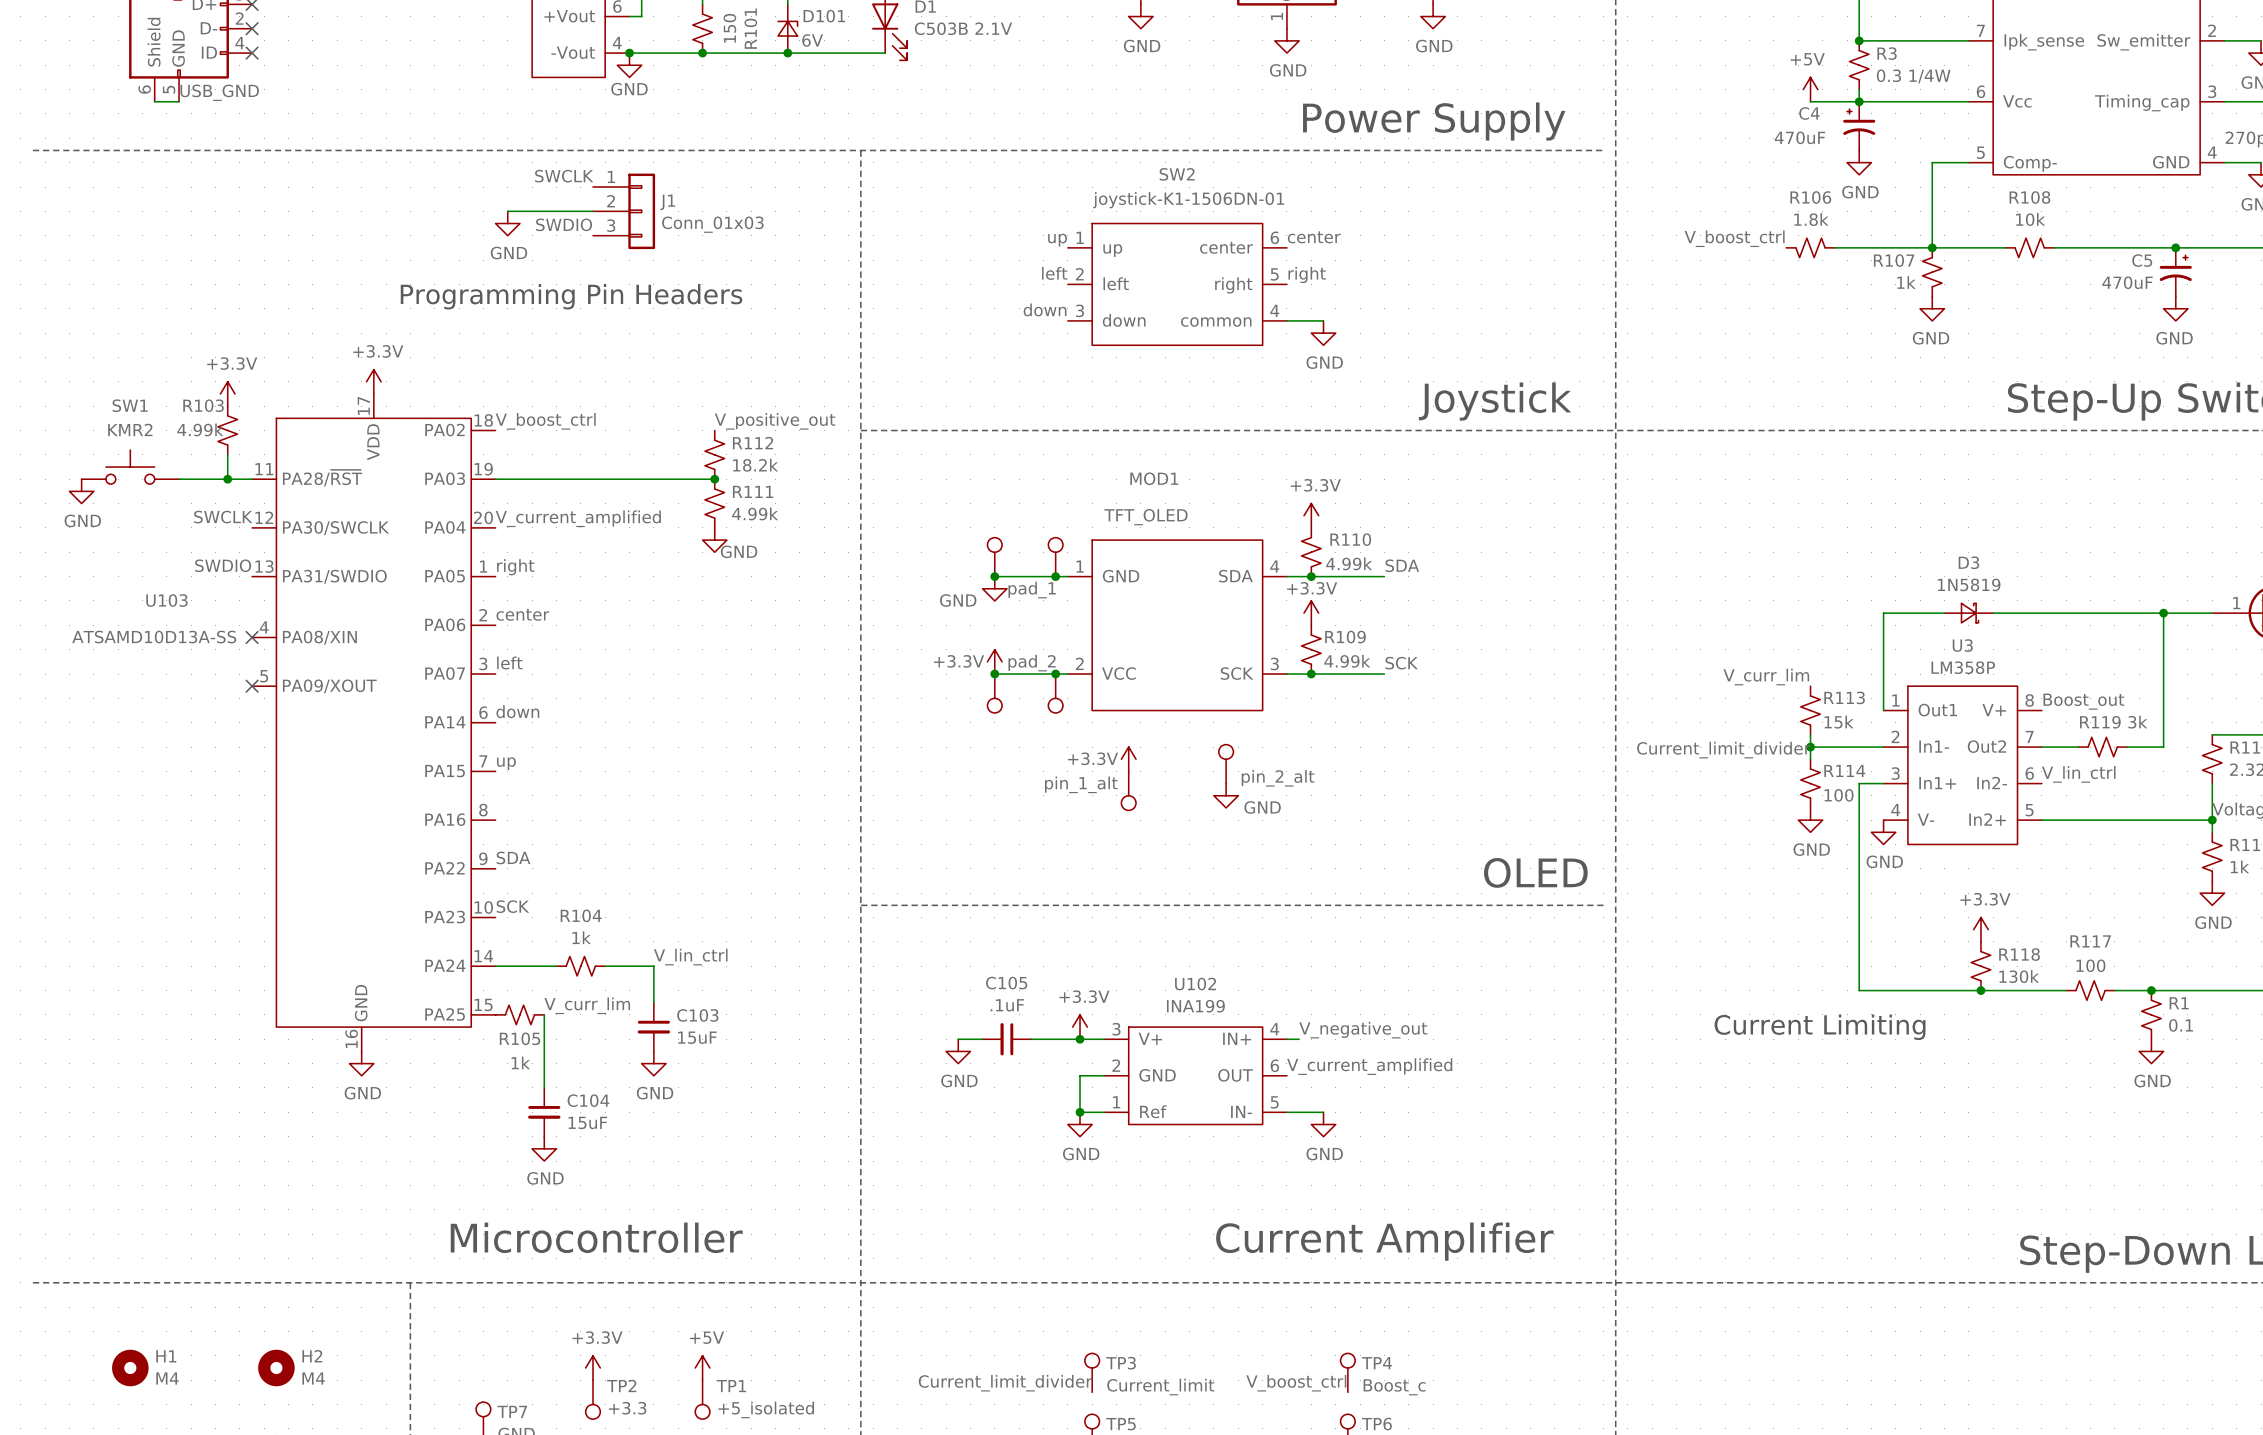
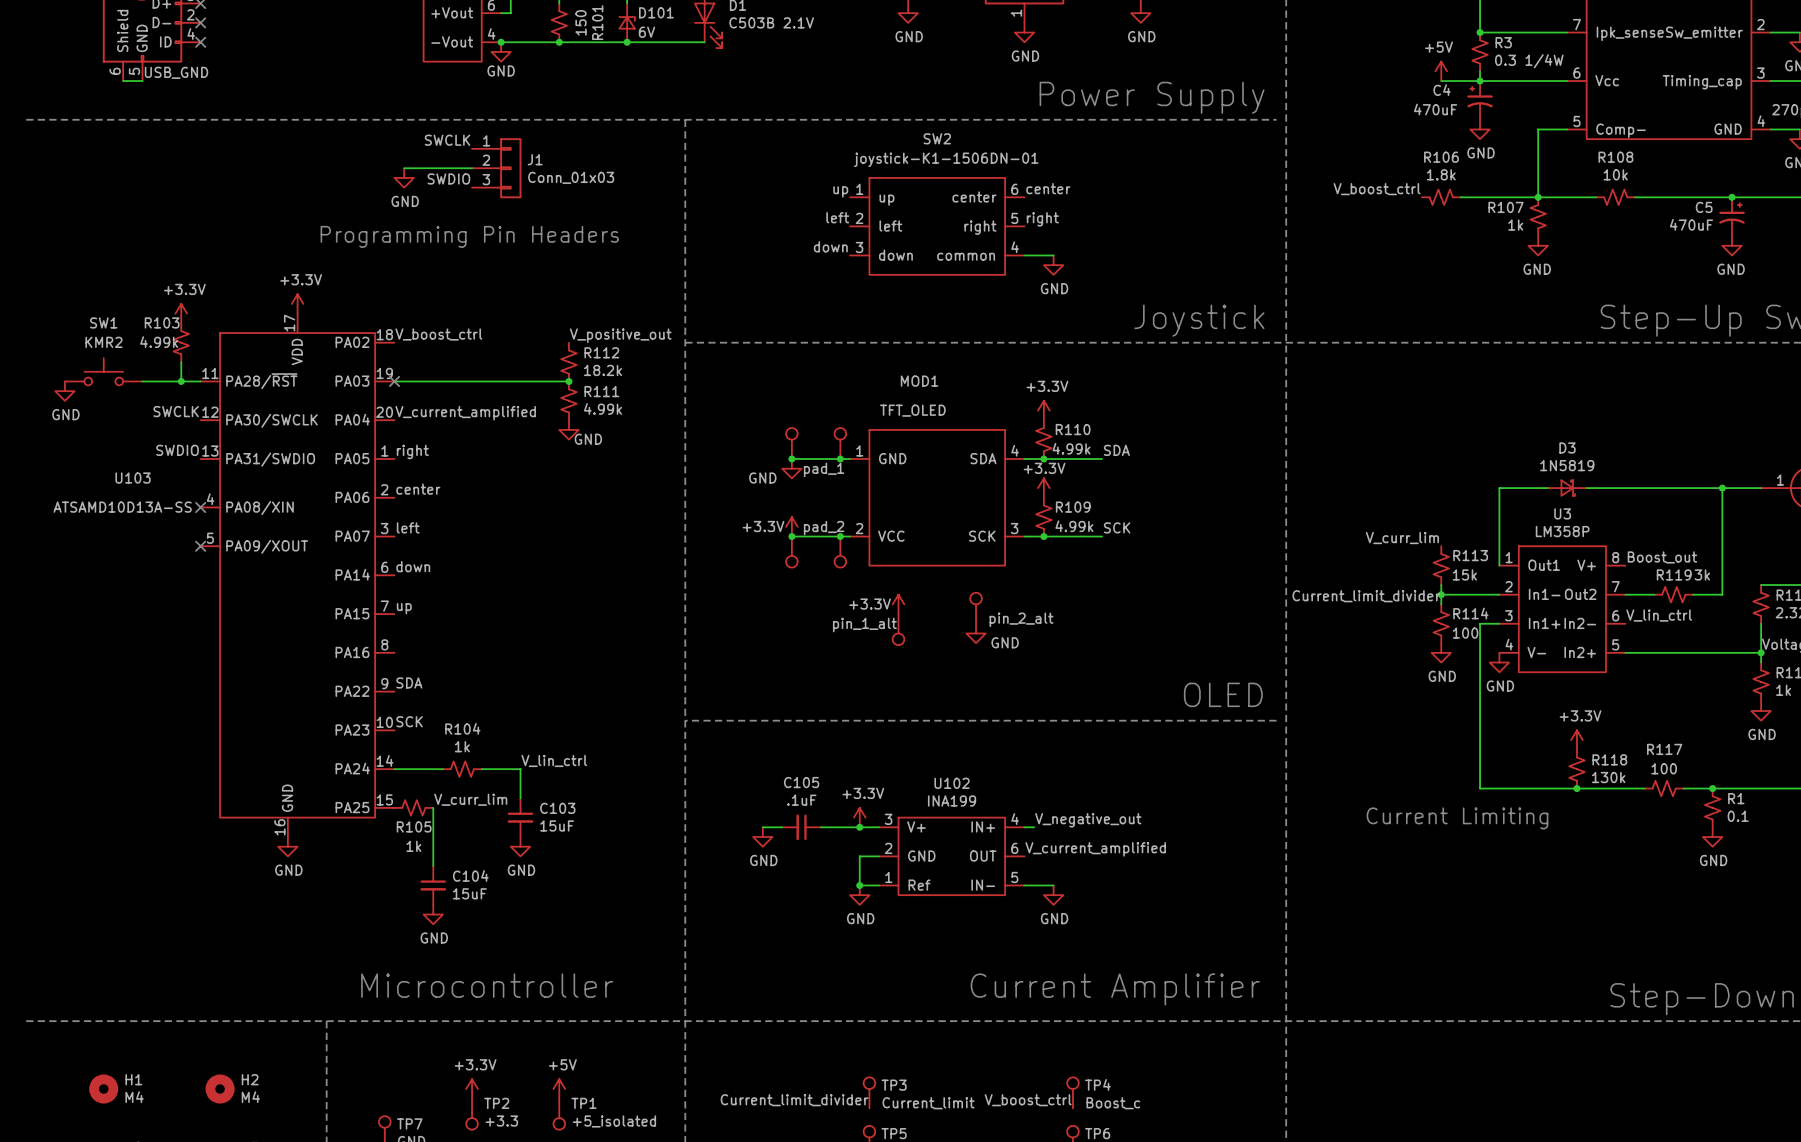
no-connect mark: none -> (394, 381)

